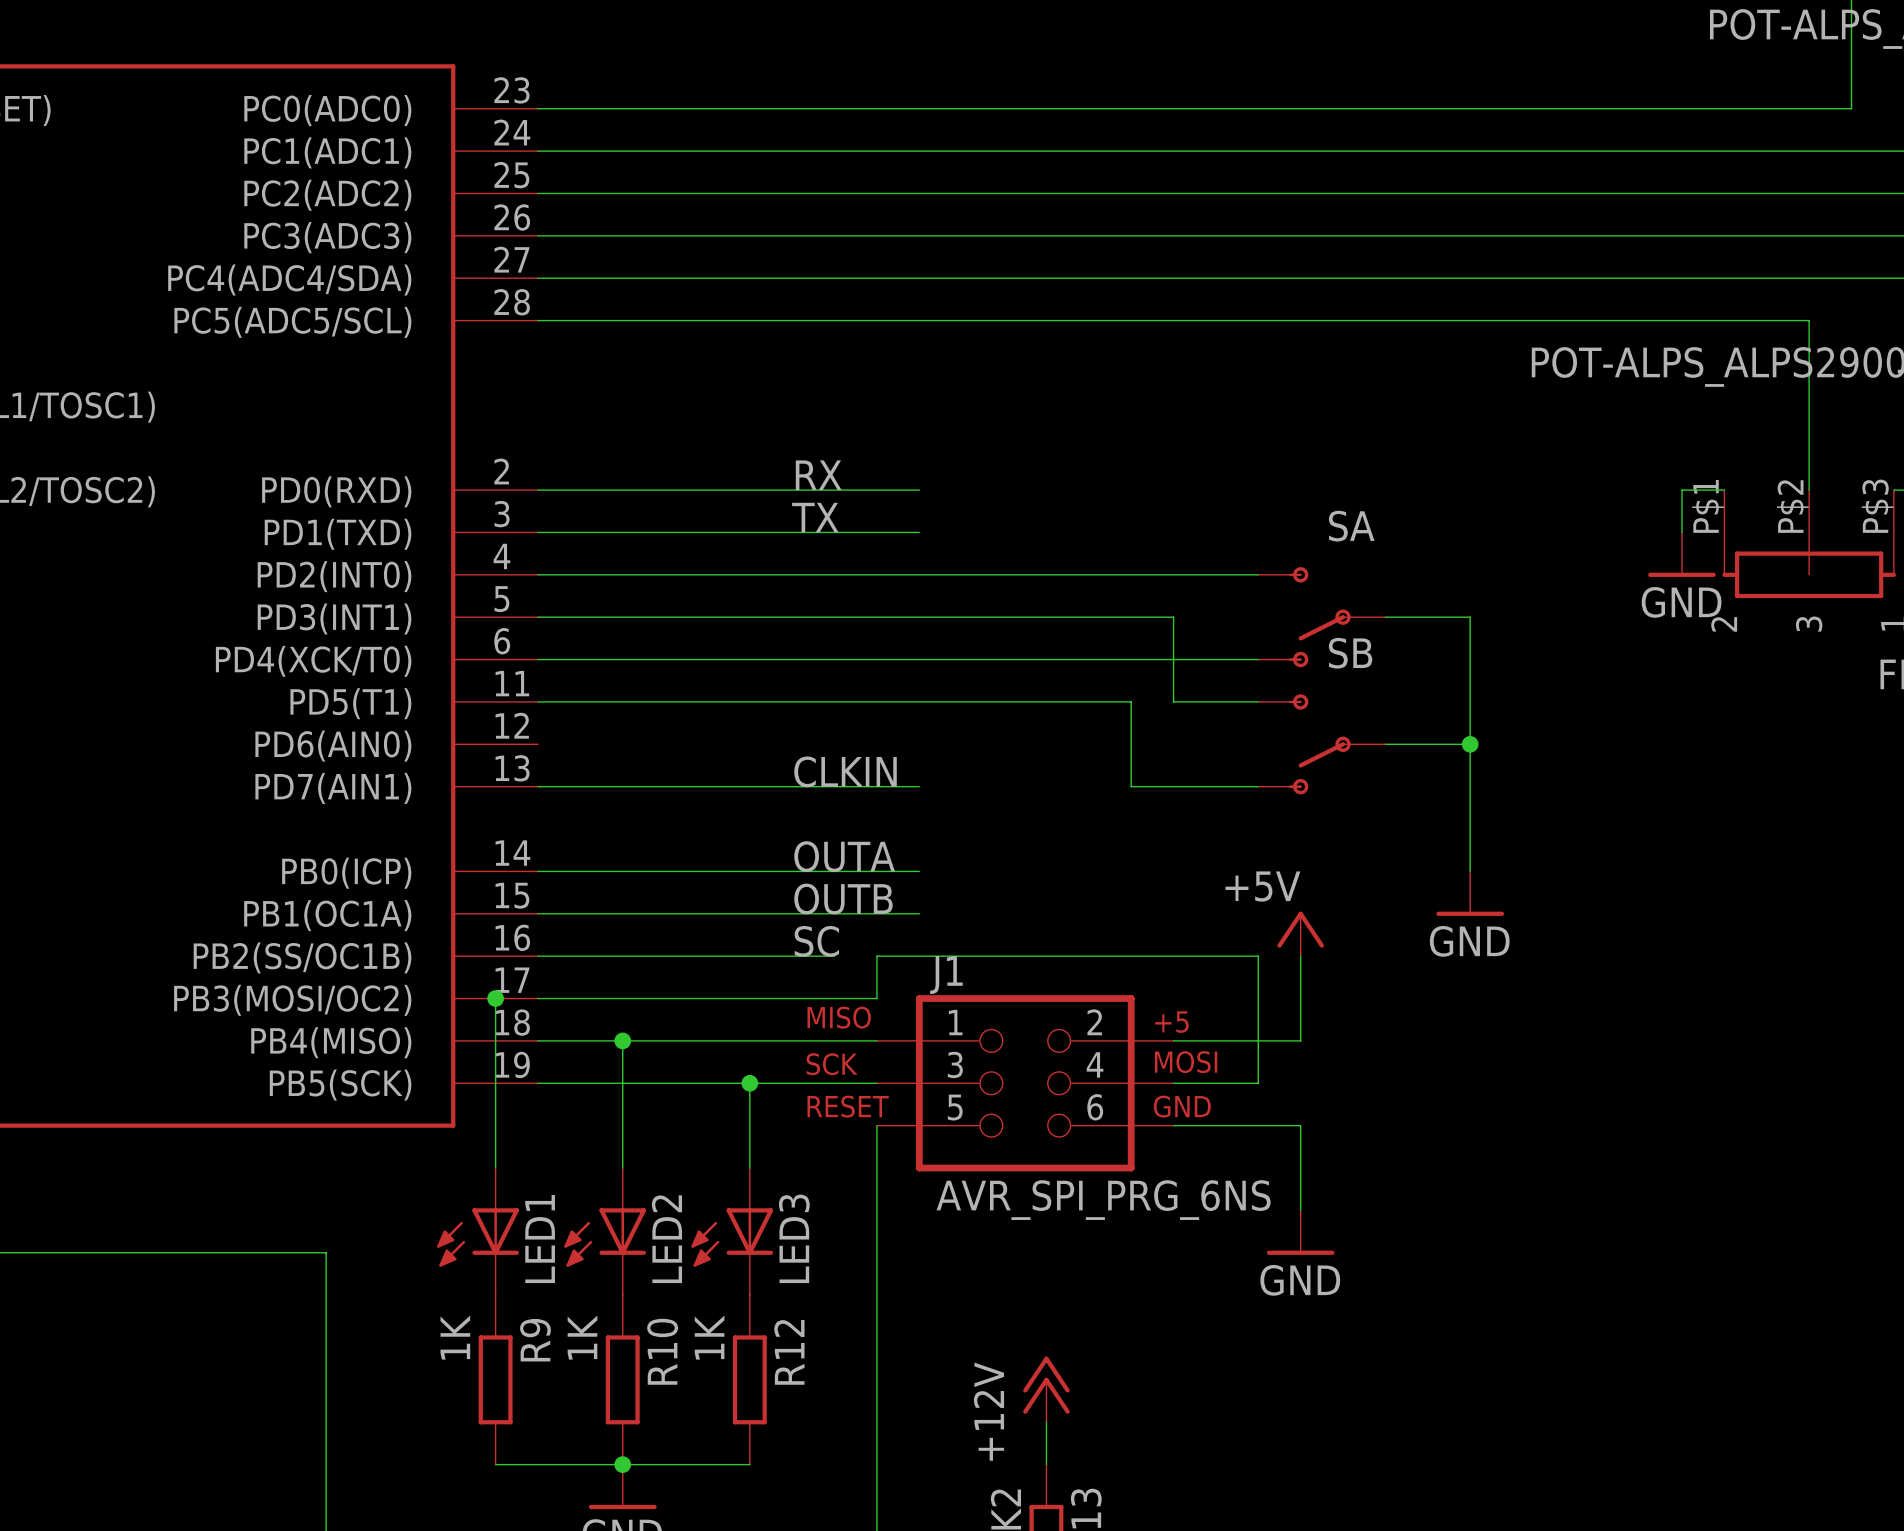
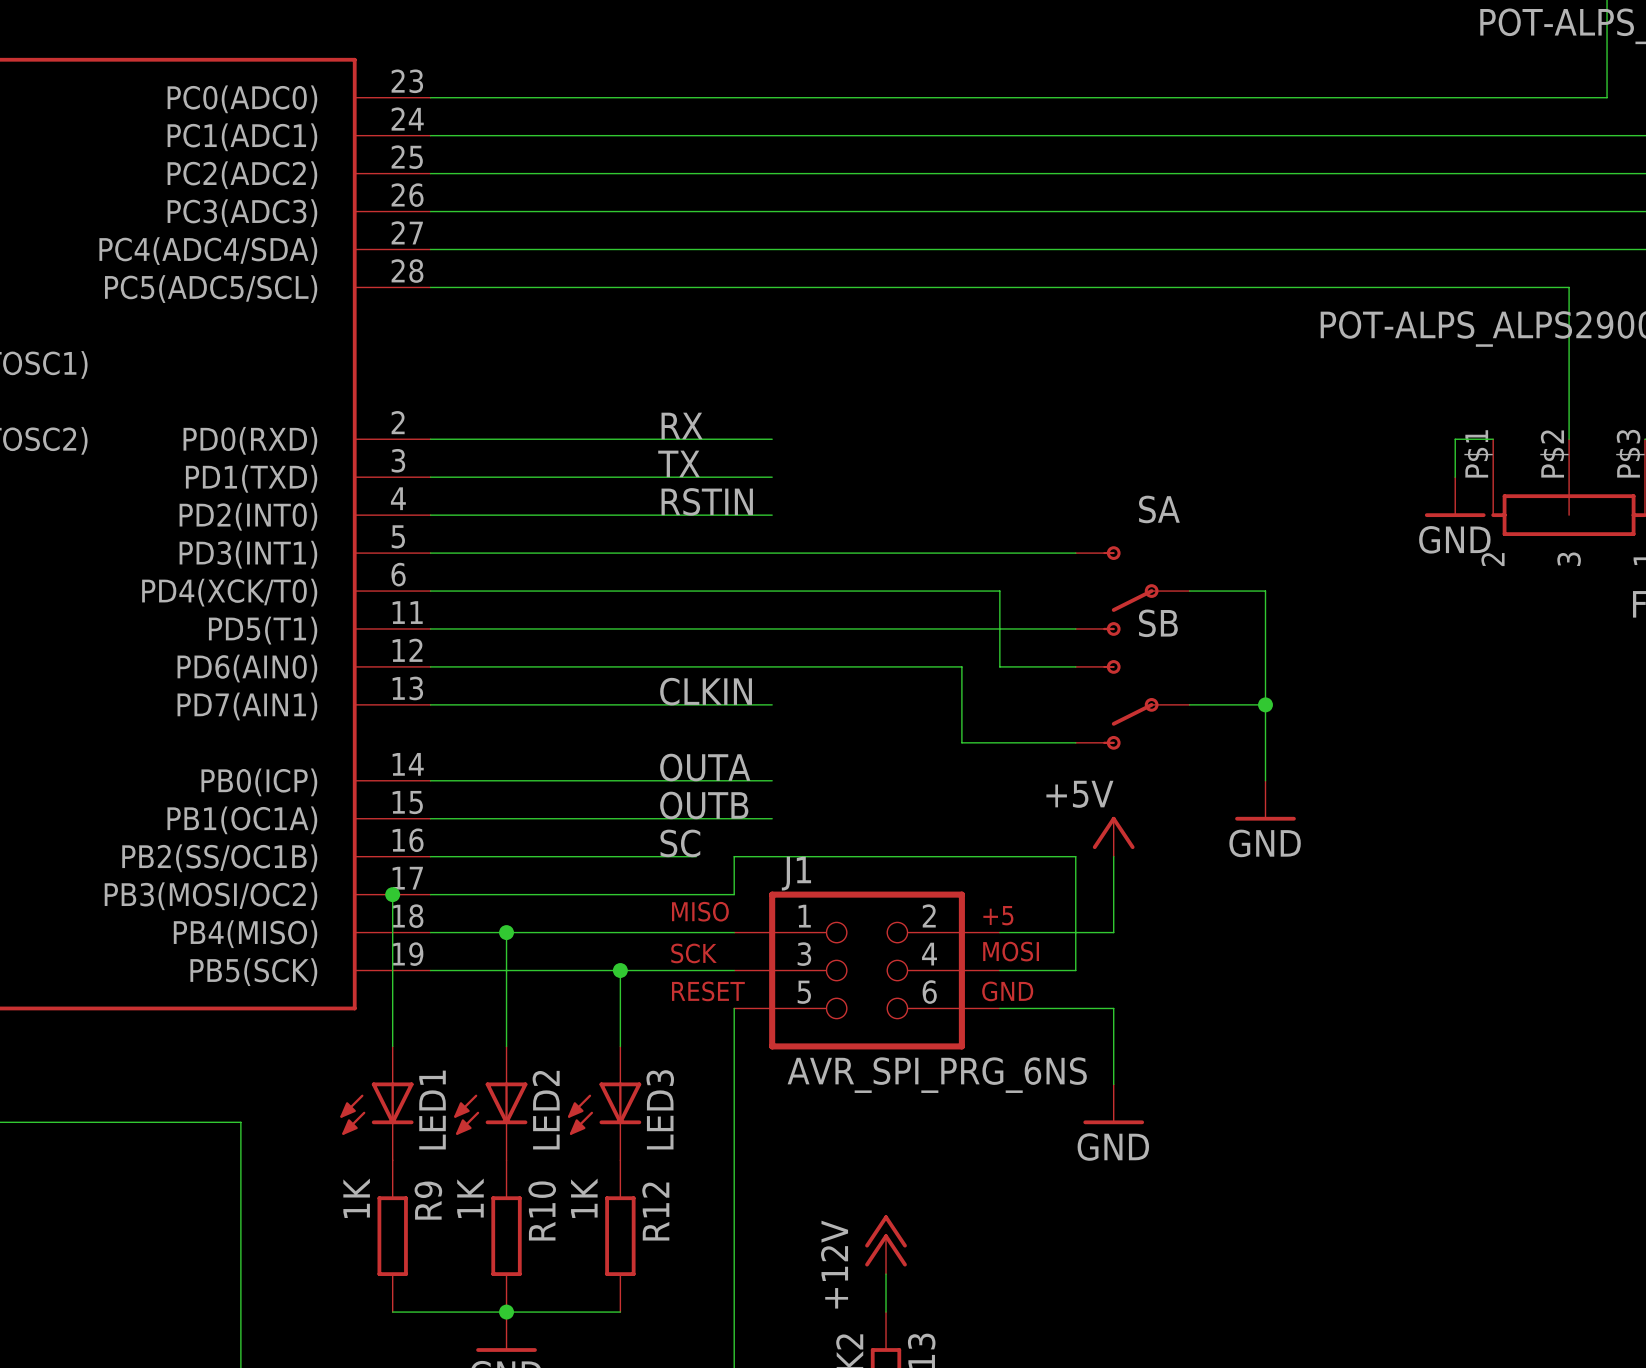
label: none -> RSTIN (707, 501)
wire: (919, 574) (1258, 574) -> none
wire: (1173, 617) (1173, 659) (1258, 659) -> (999, 553) (1075, 553)
SA position: (1321, 617) -> (1132, 591)
wire: (1385, 617) (1470, 617) (1470, 659) -> (1189, 591) (1265, 591)
wire: (1131, 701) (1131, 744) -> (961, 628) (999, 628) (999, 666) (1075, 666)
wire: none -> (430, 666) (961, 666)
SB position: (1321, 744) -> (1132, 704)
wire: (1385, 744) (1470, 744) -> (1189, 704) (1265, 704)
junction position: (1470, 744) -> (1265, 704)
wire: (1131, 786) (1258, 786) -> (961, 704) (961, 742) (1075, 742)

